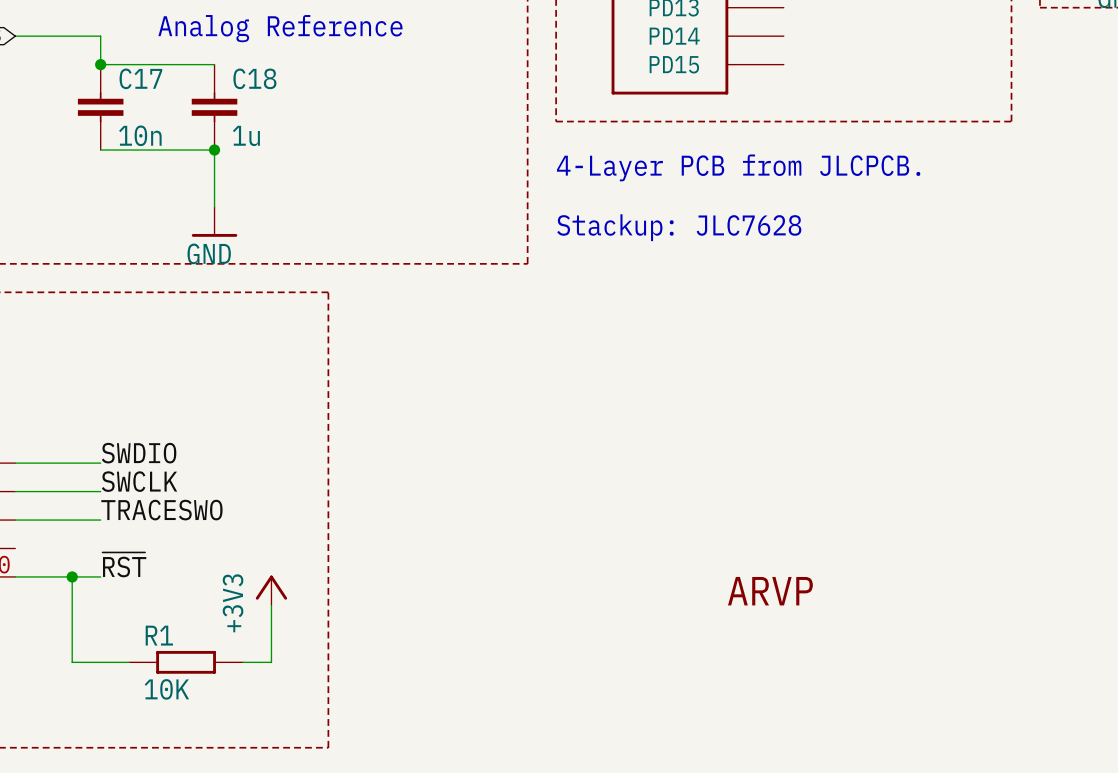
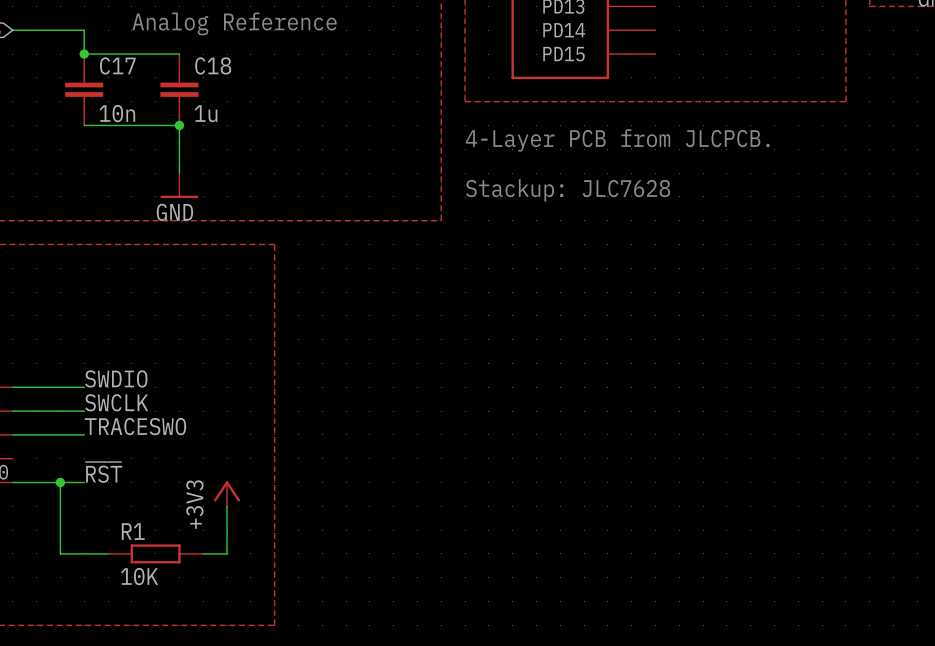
part: (770, 591) -> none

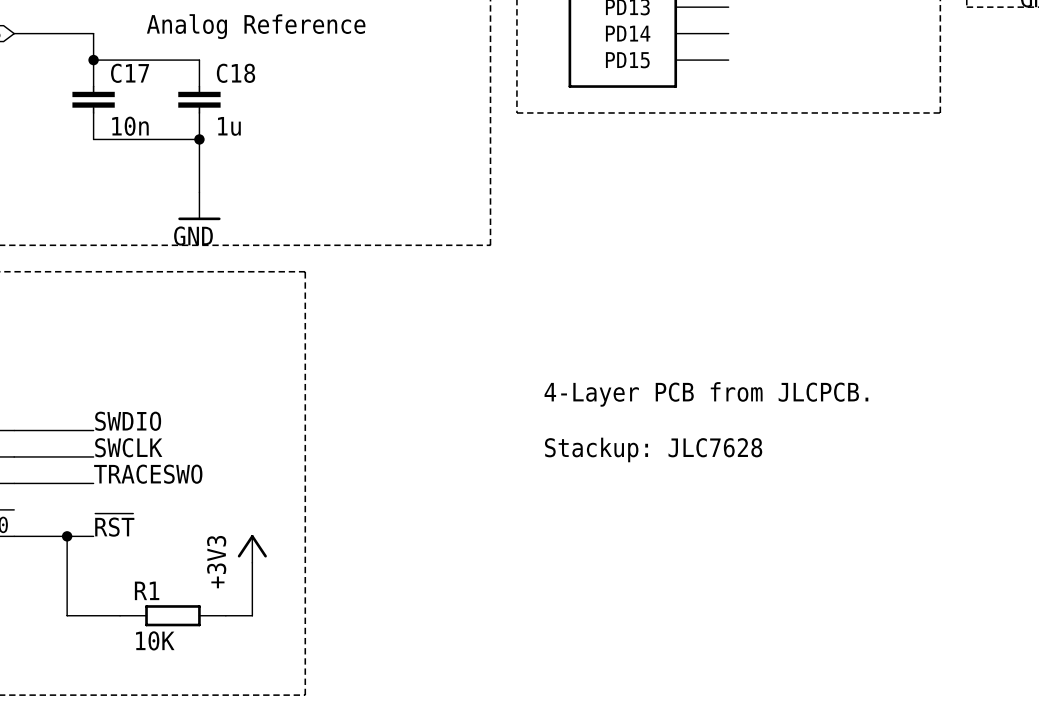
text position: 4-Layer PCB from JLCPCB. (617, 140) -> 4-Layer PCB from JLCPCB. (706, 394)
text position: Stackup: JLC7628 (568, 190) -> Stackup: JLC7628 (653, 449)

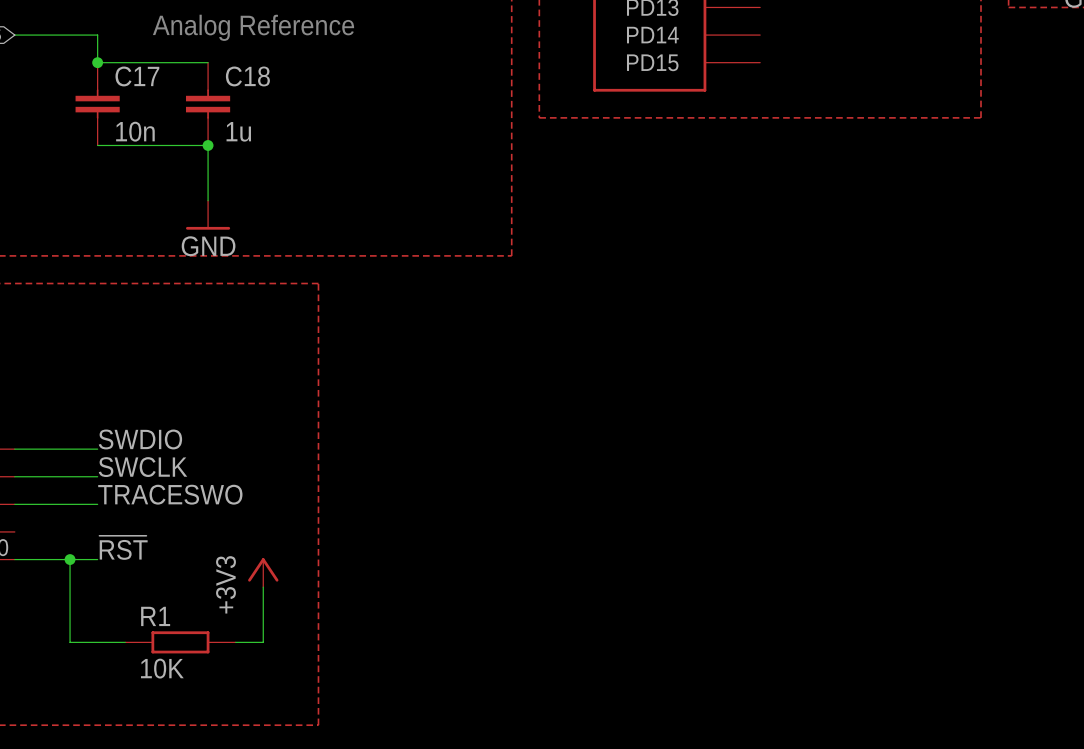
text: 4-Layer PCB from JLCPCB. (706, 394) -> none
text: Stackup: JLC7628 (653, 449) -> none

